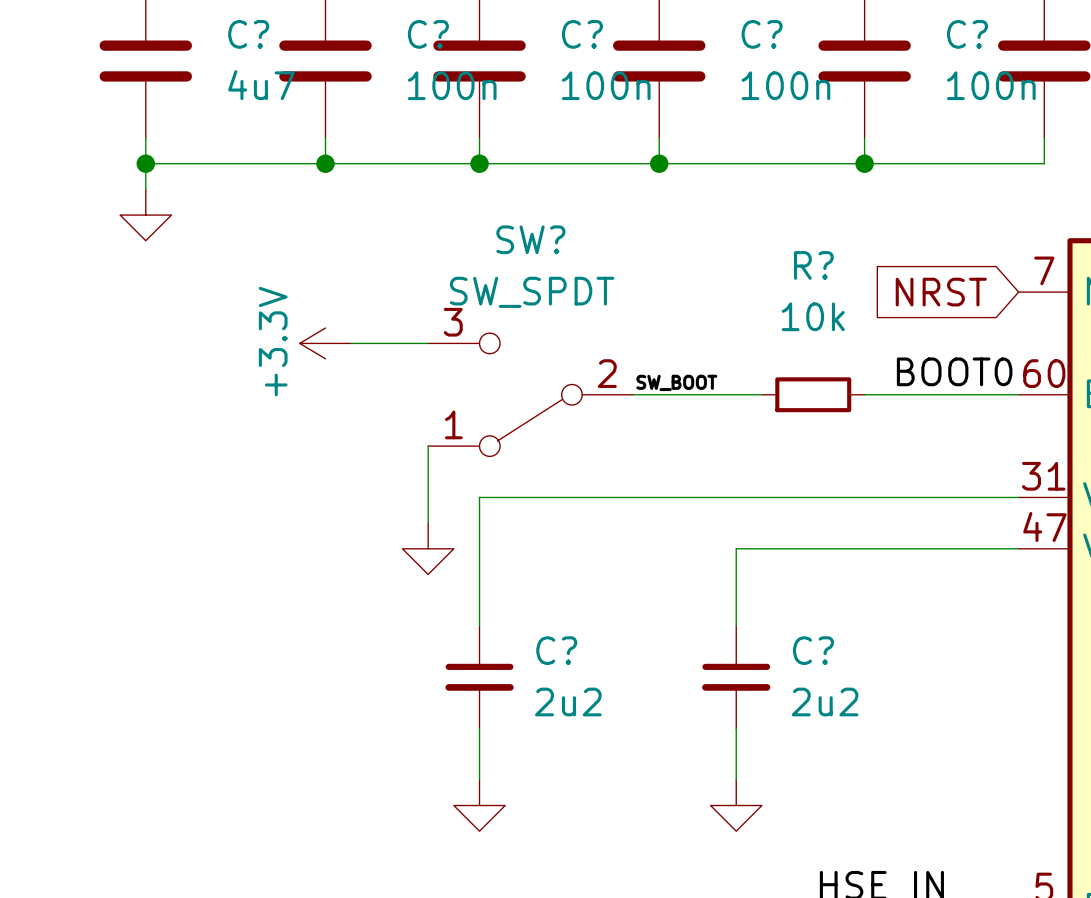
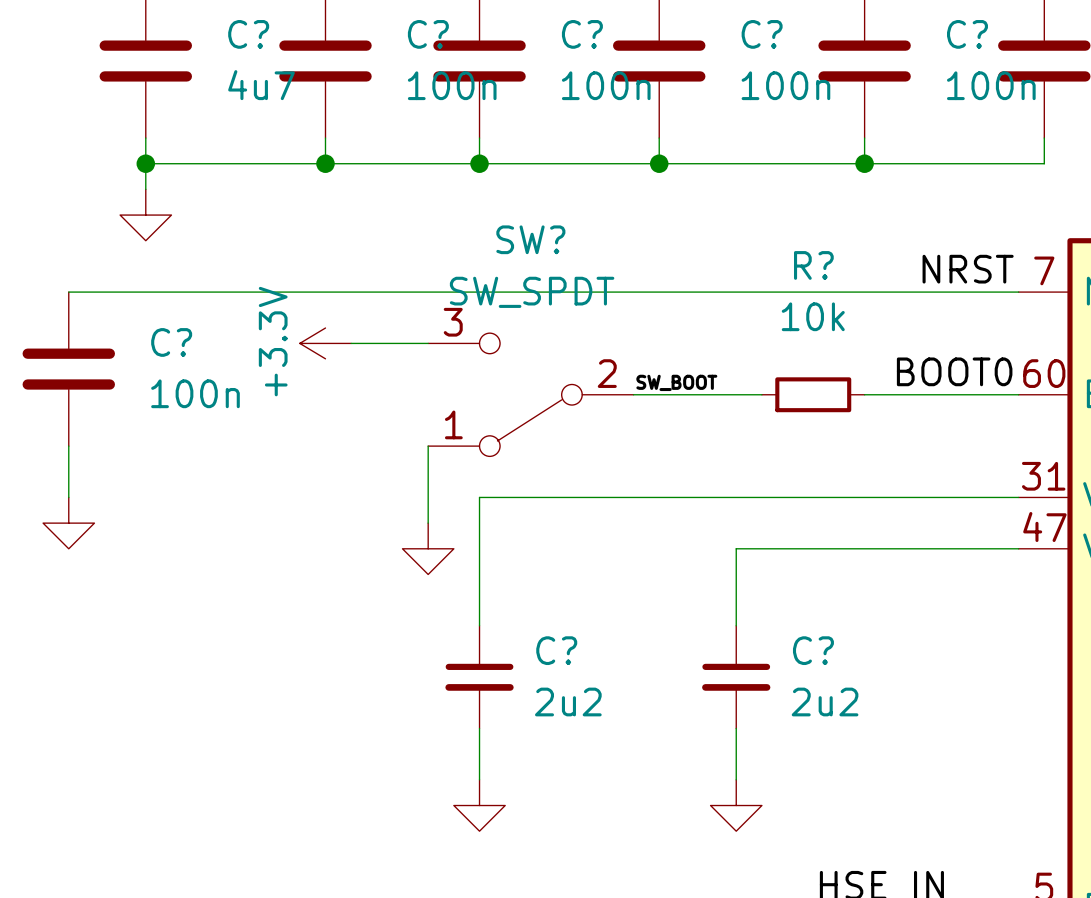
label: none -> NRST (968, 269)
wire: none -> (68, 292) (1018, 292)
global label: NRST (941, 292) -> none
C?: none -> 100n (68, 369)
wire: none -> (68, 446) (68, 497)
power symbol: none -> (68, 523)

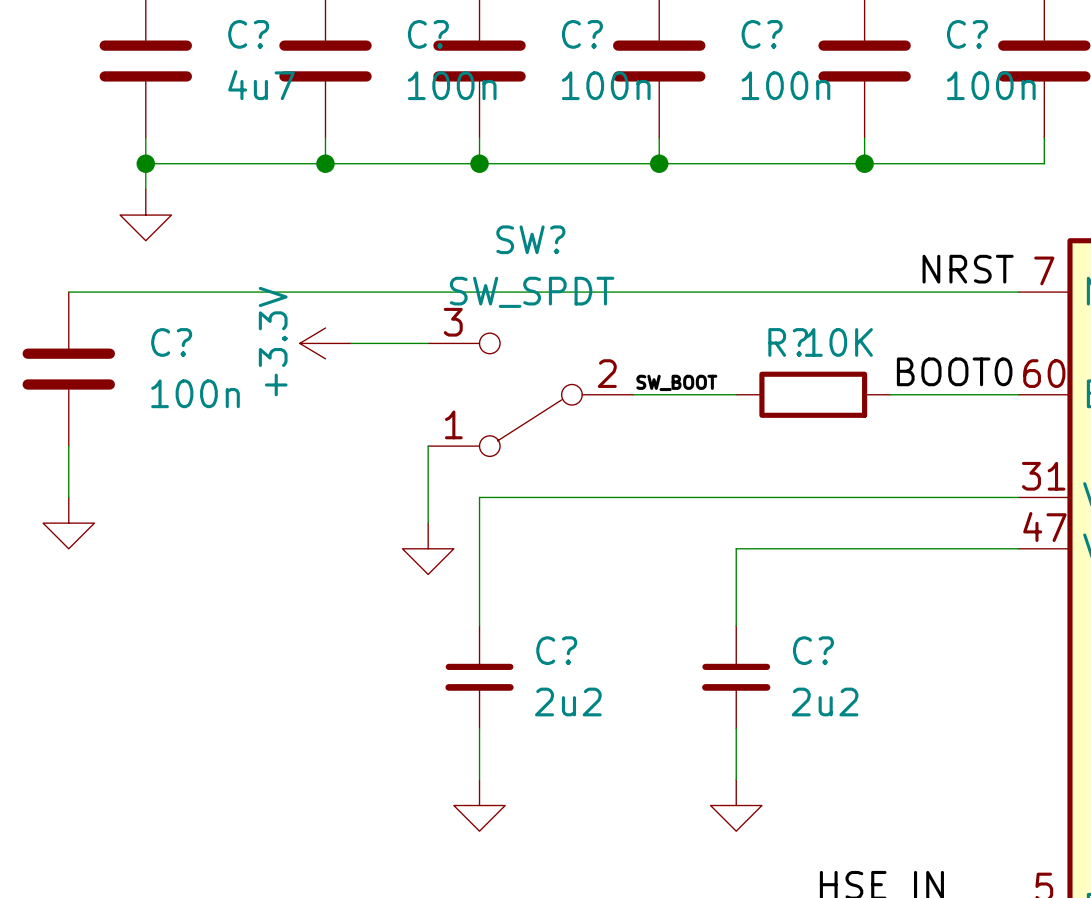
R? name position: R? (813, 265) -> R? (788, 342)
R? value: 10k (813, 316) -> 10K (838, 342)
R? symbol: [761, 377, 865, 413] -> [736, 371, 891, 418]

